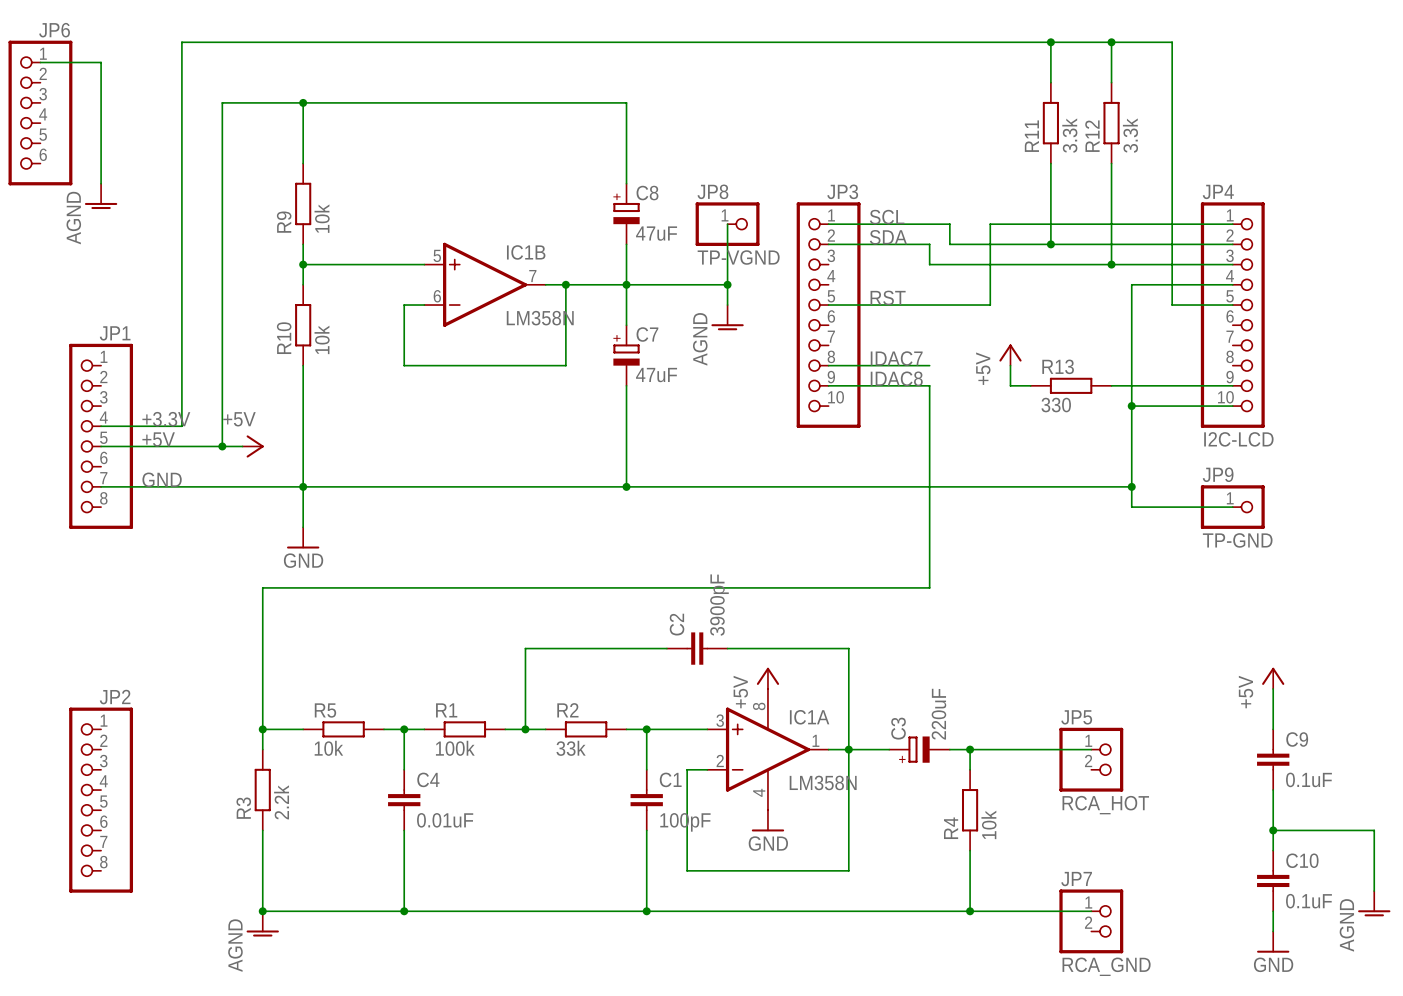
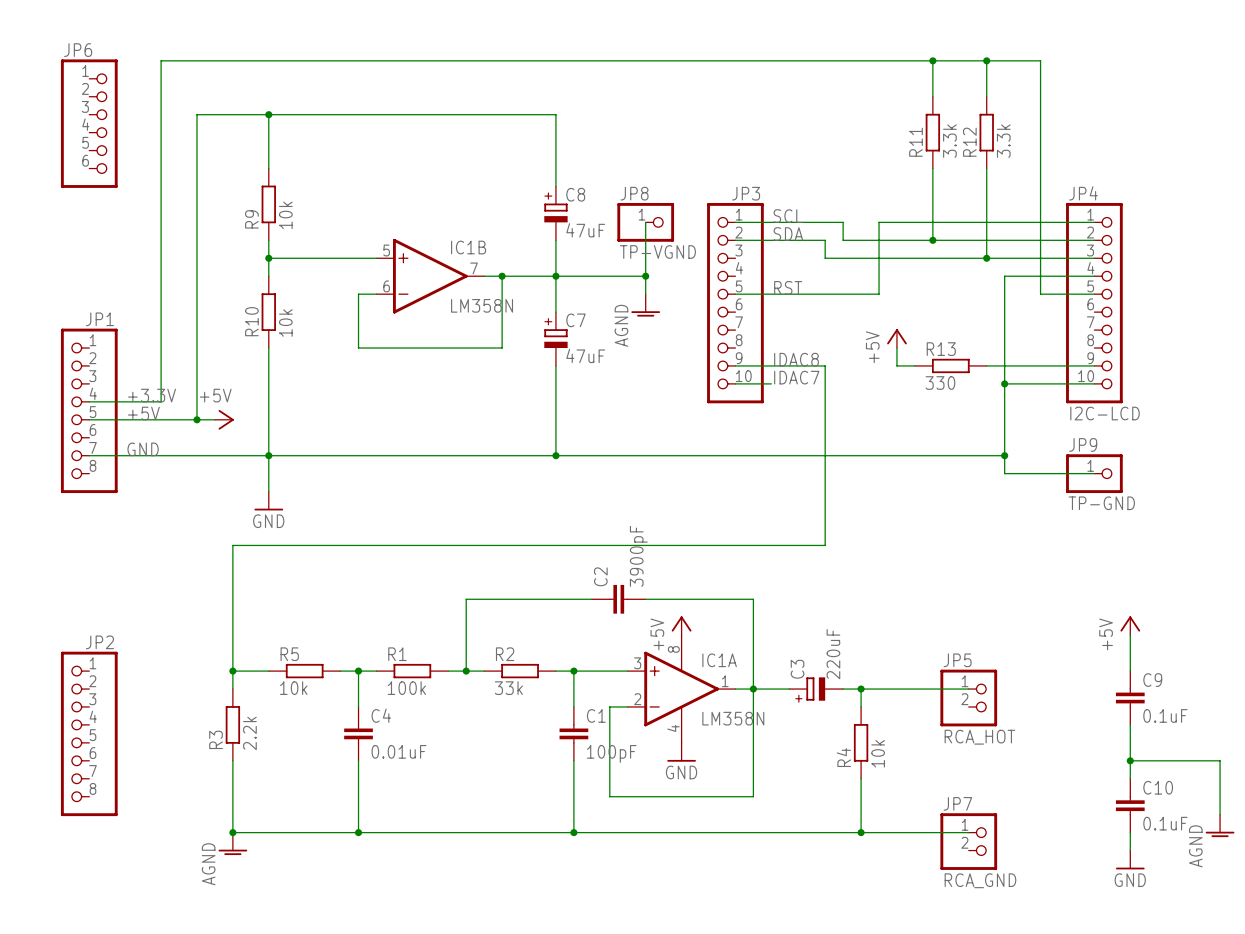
wire: (40, 62) (101, 62) (101, 183) -> none
JP6 flip: as is (40, 113) -> left-right (89, 123)
power symbol: AGND (101, 196) -> none
label position: IDAC7 (896, 358) -> IDAC7 (796, 377)
wire: (828, 365) (929, 365) -> none
wire: none -> (735, 383) (771, 383)

